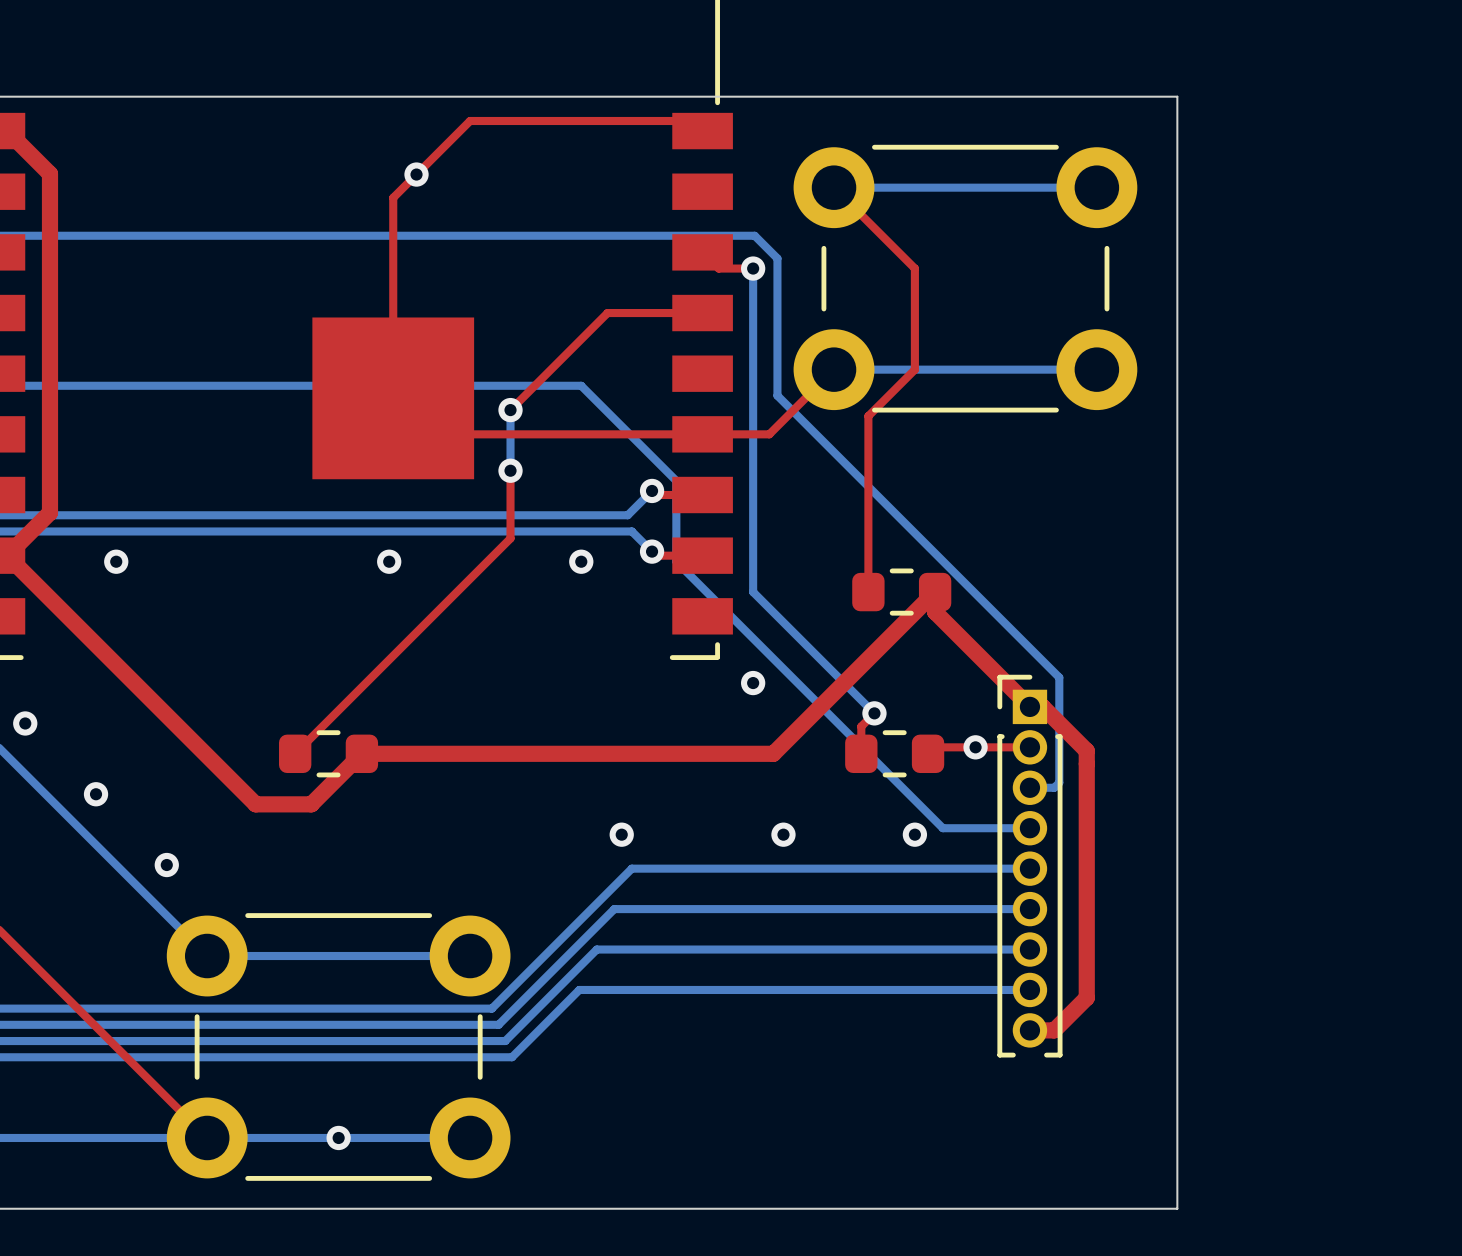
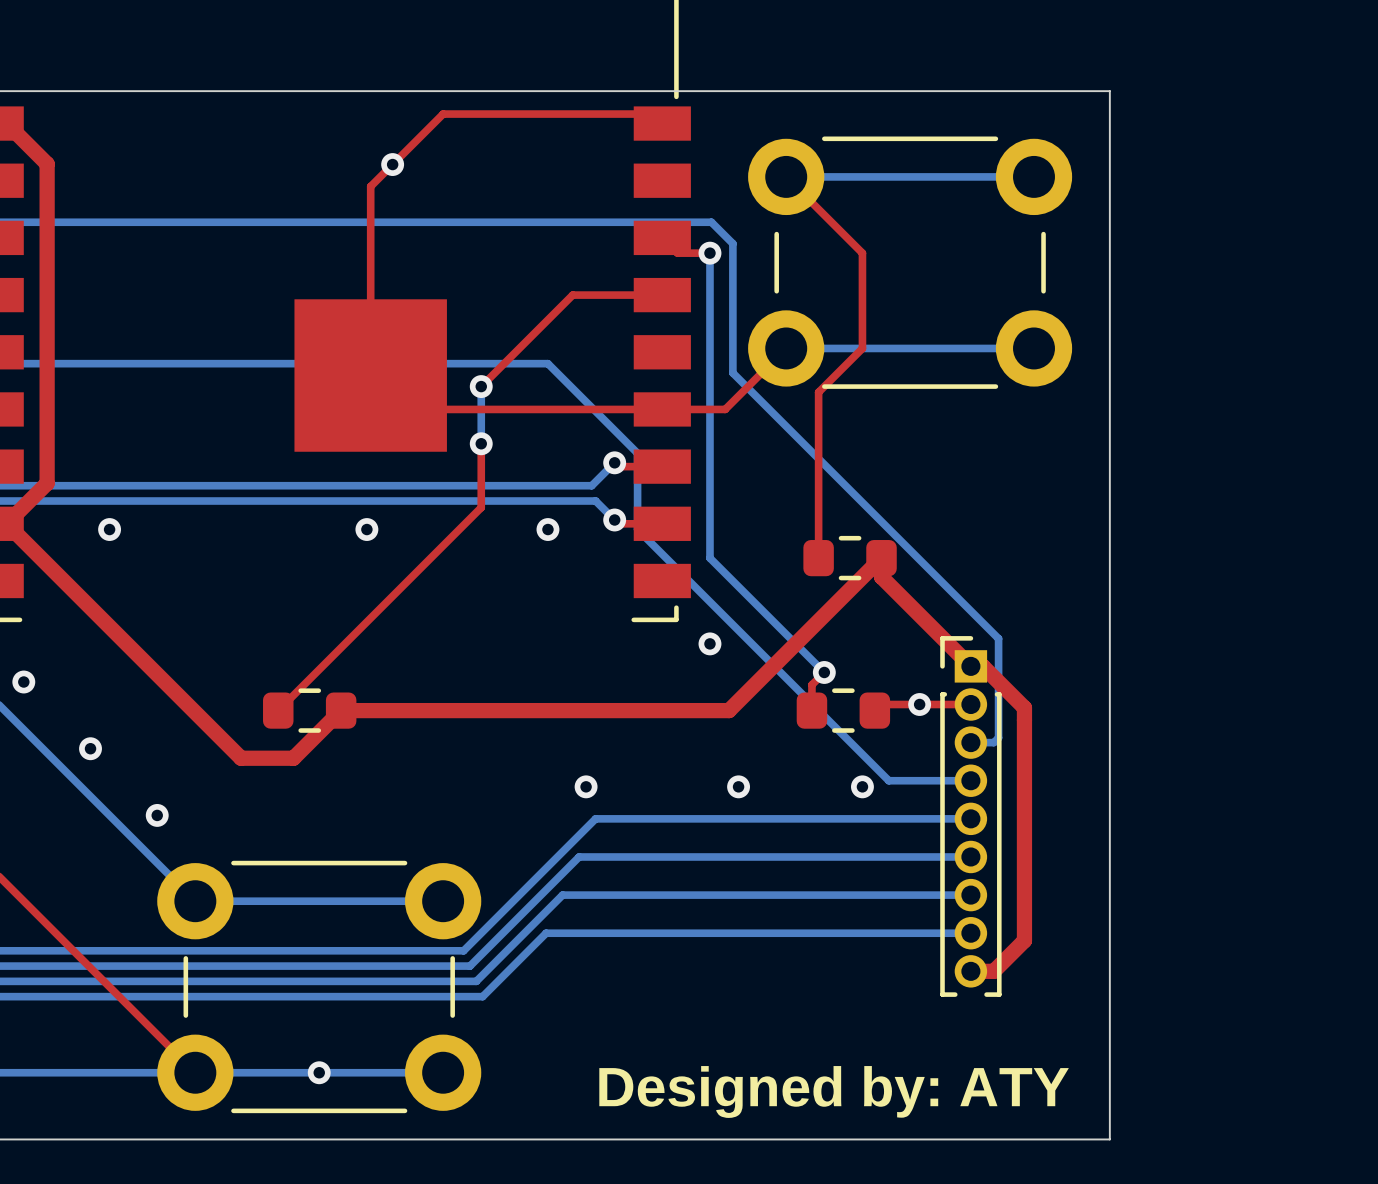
text: none -> Designed by: ATY (834, 1091)

